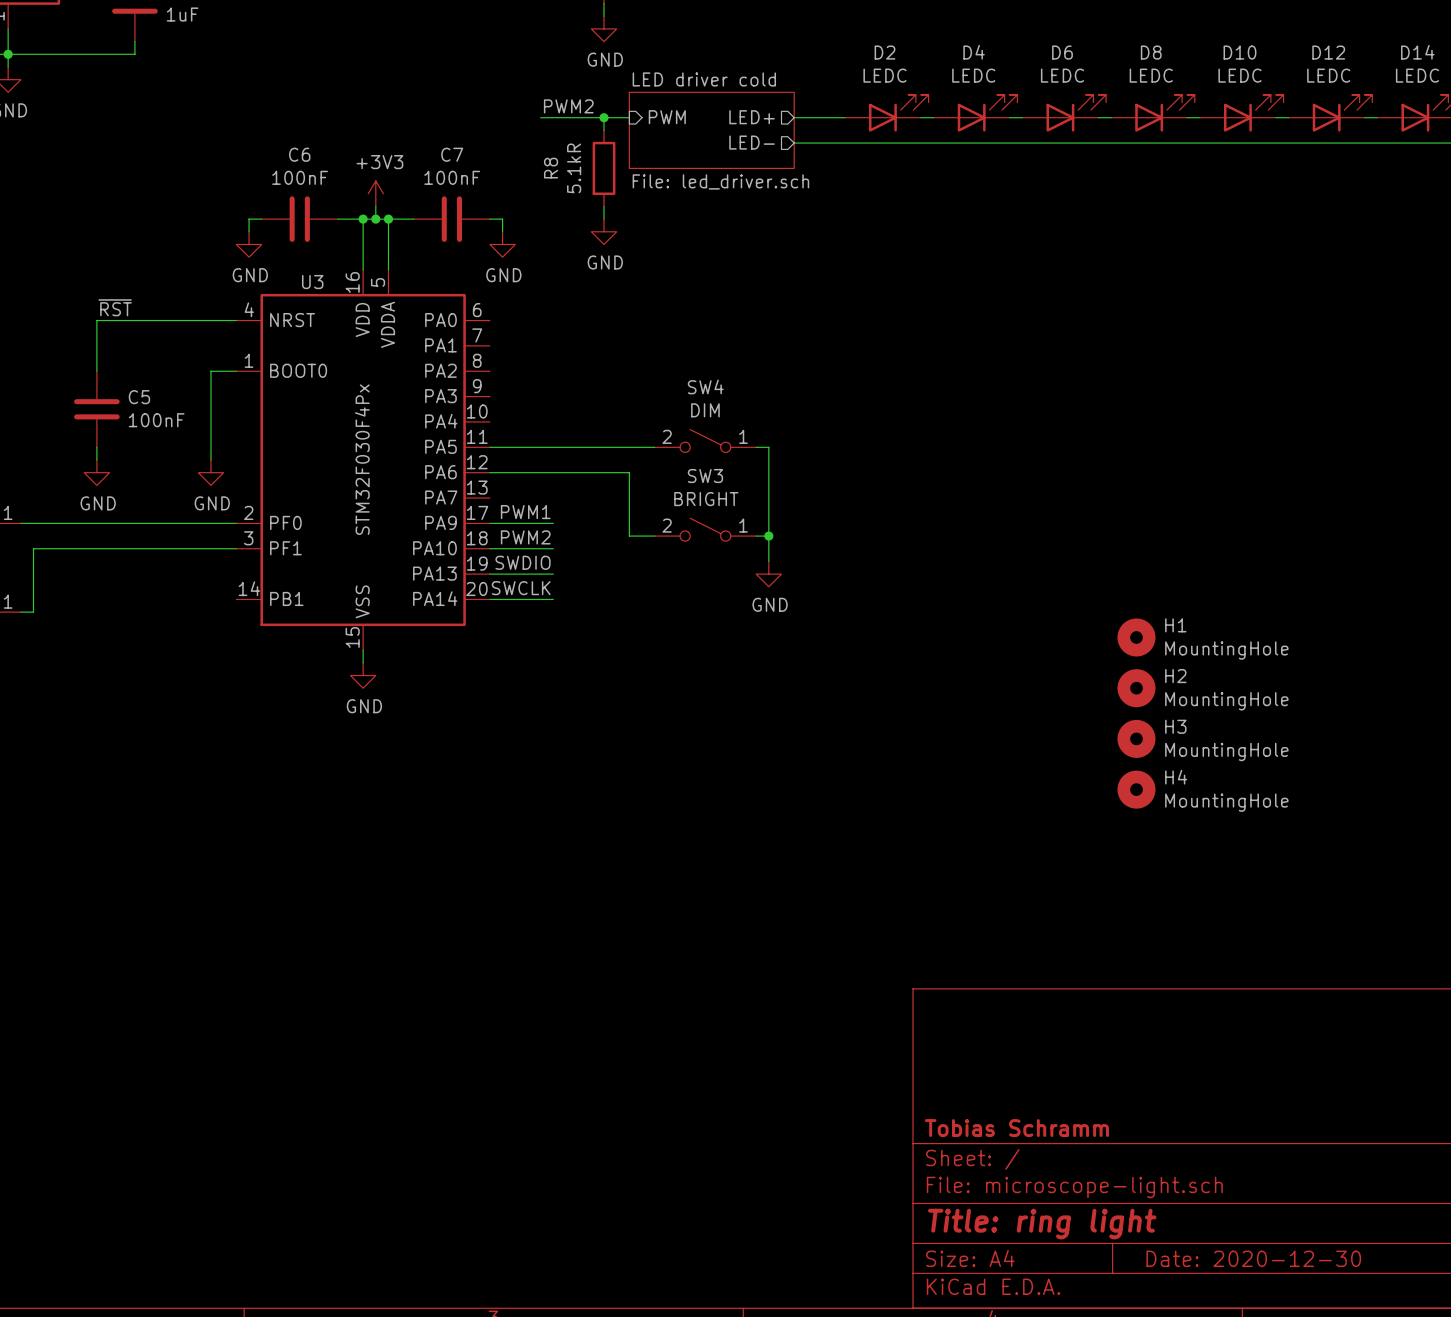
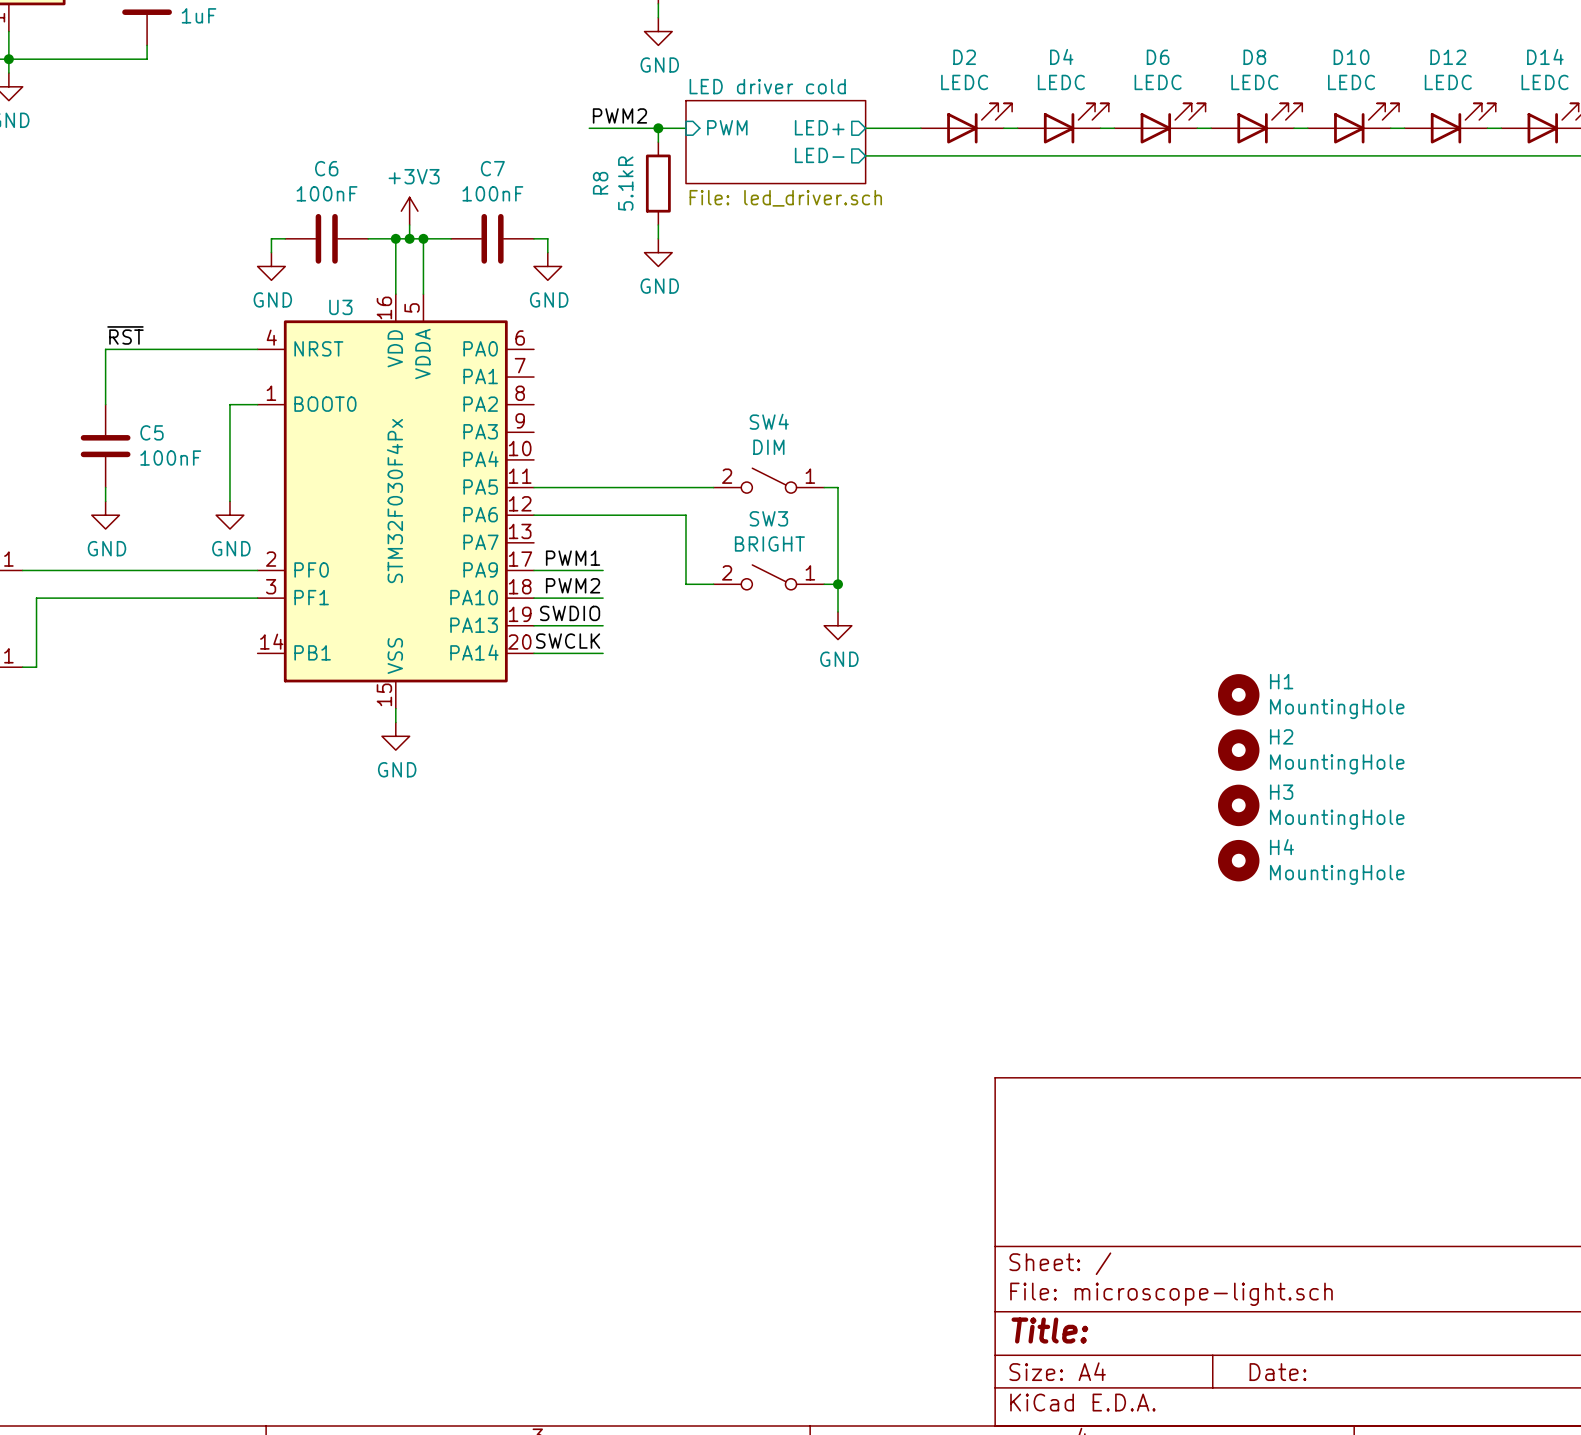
title block: Tobias Schramm (1016, 1128) -> none
title block: Title: ring light (1042, 1224) -> Title: (1049, 1330)
title block: Date: 2020-12-30 (1253, 1258) -> Date: (1277, 1372)

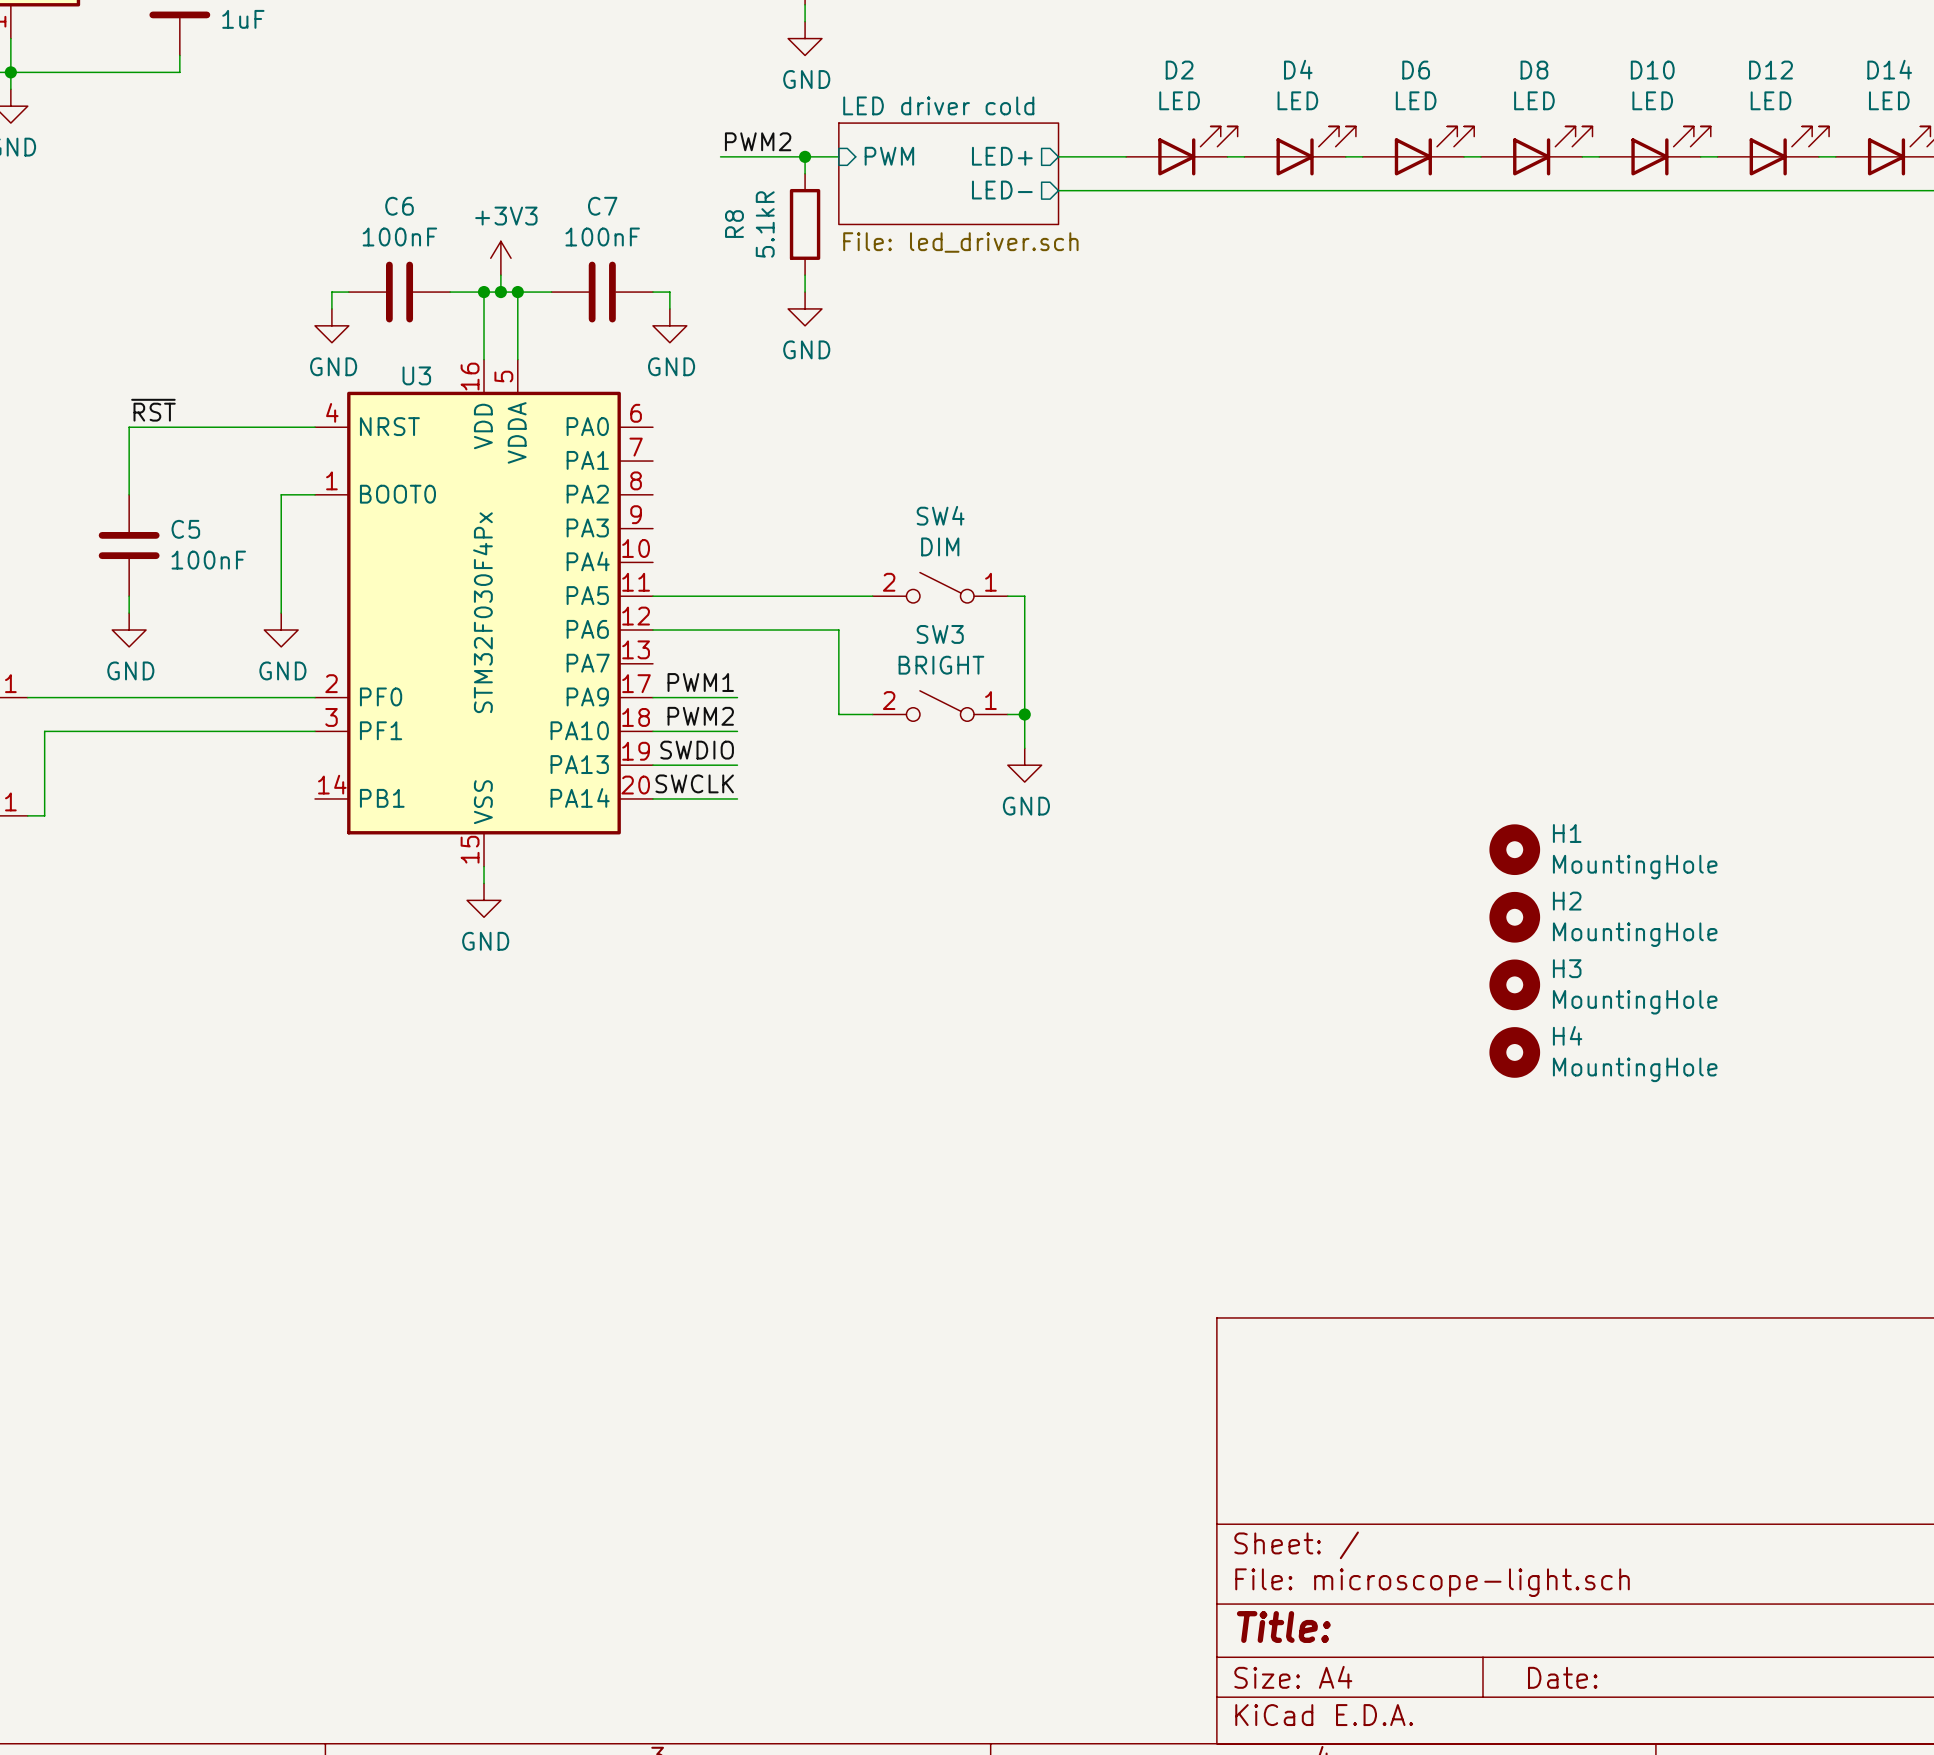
D2 value: LEDC (964, 82) -> LED (1179, 100)
D4 value: LEDC (1061, 82) -> LED (1297, 100)
D6 value: LEDC (1158, 82) -> LED (1416, 100)
D8 value: LEDC (1254, 82) -> LED (1534, 100)
D10 value: LEDC (1351, 82) -> LED (1652, 100)
D12 value: LEDC (1448, 82) -> LED (1770, 100)
D14 value: LEDC (1545, 82) -> LED (1889, 100)

